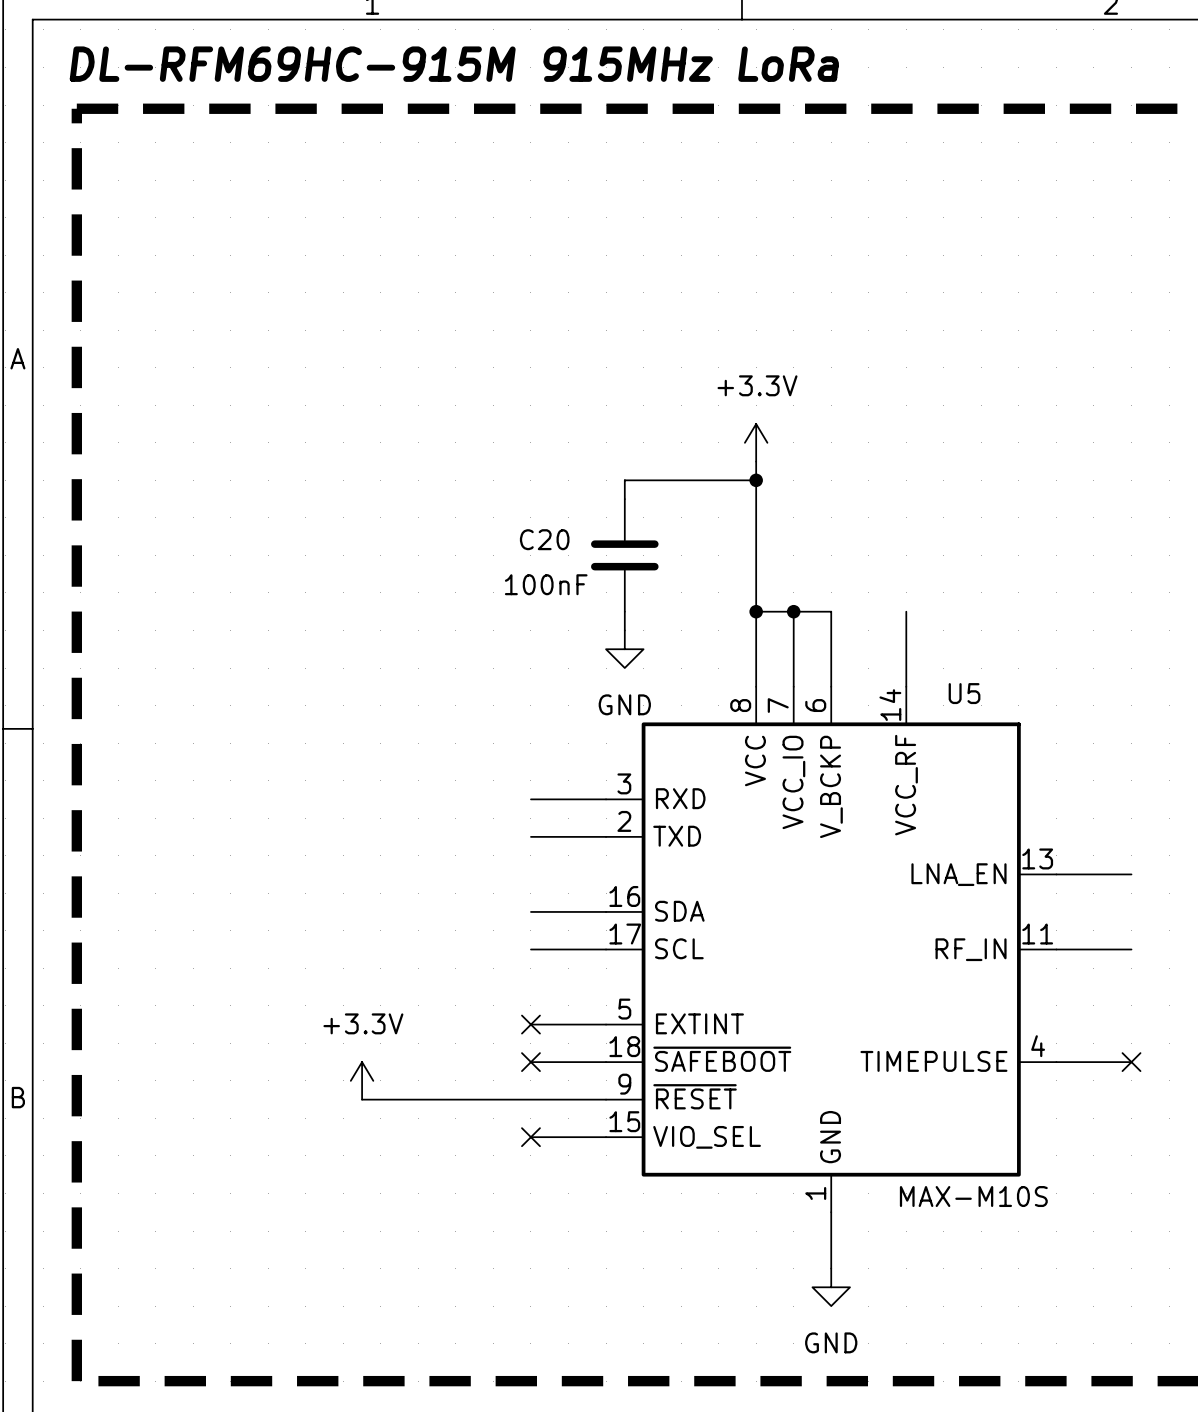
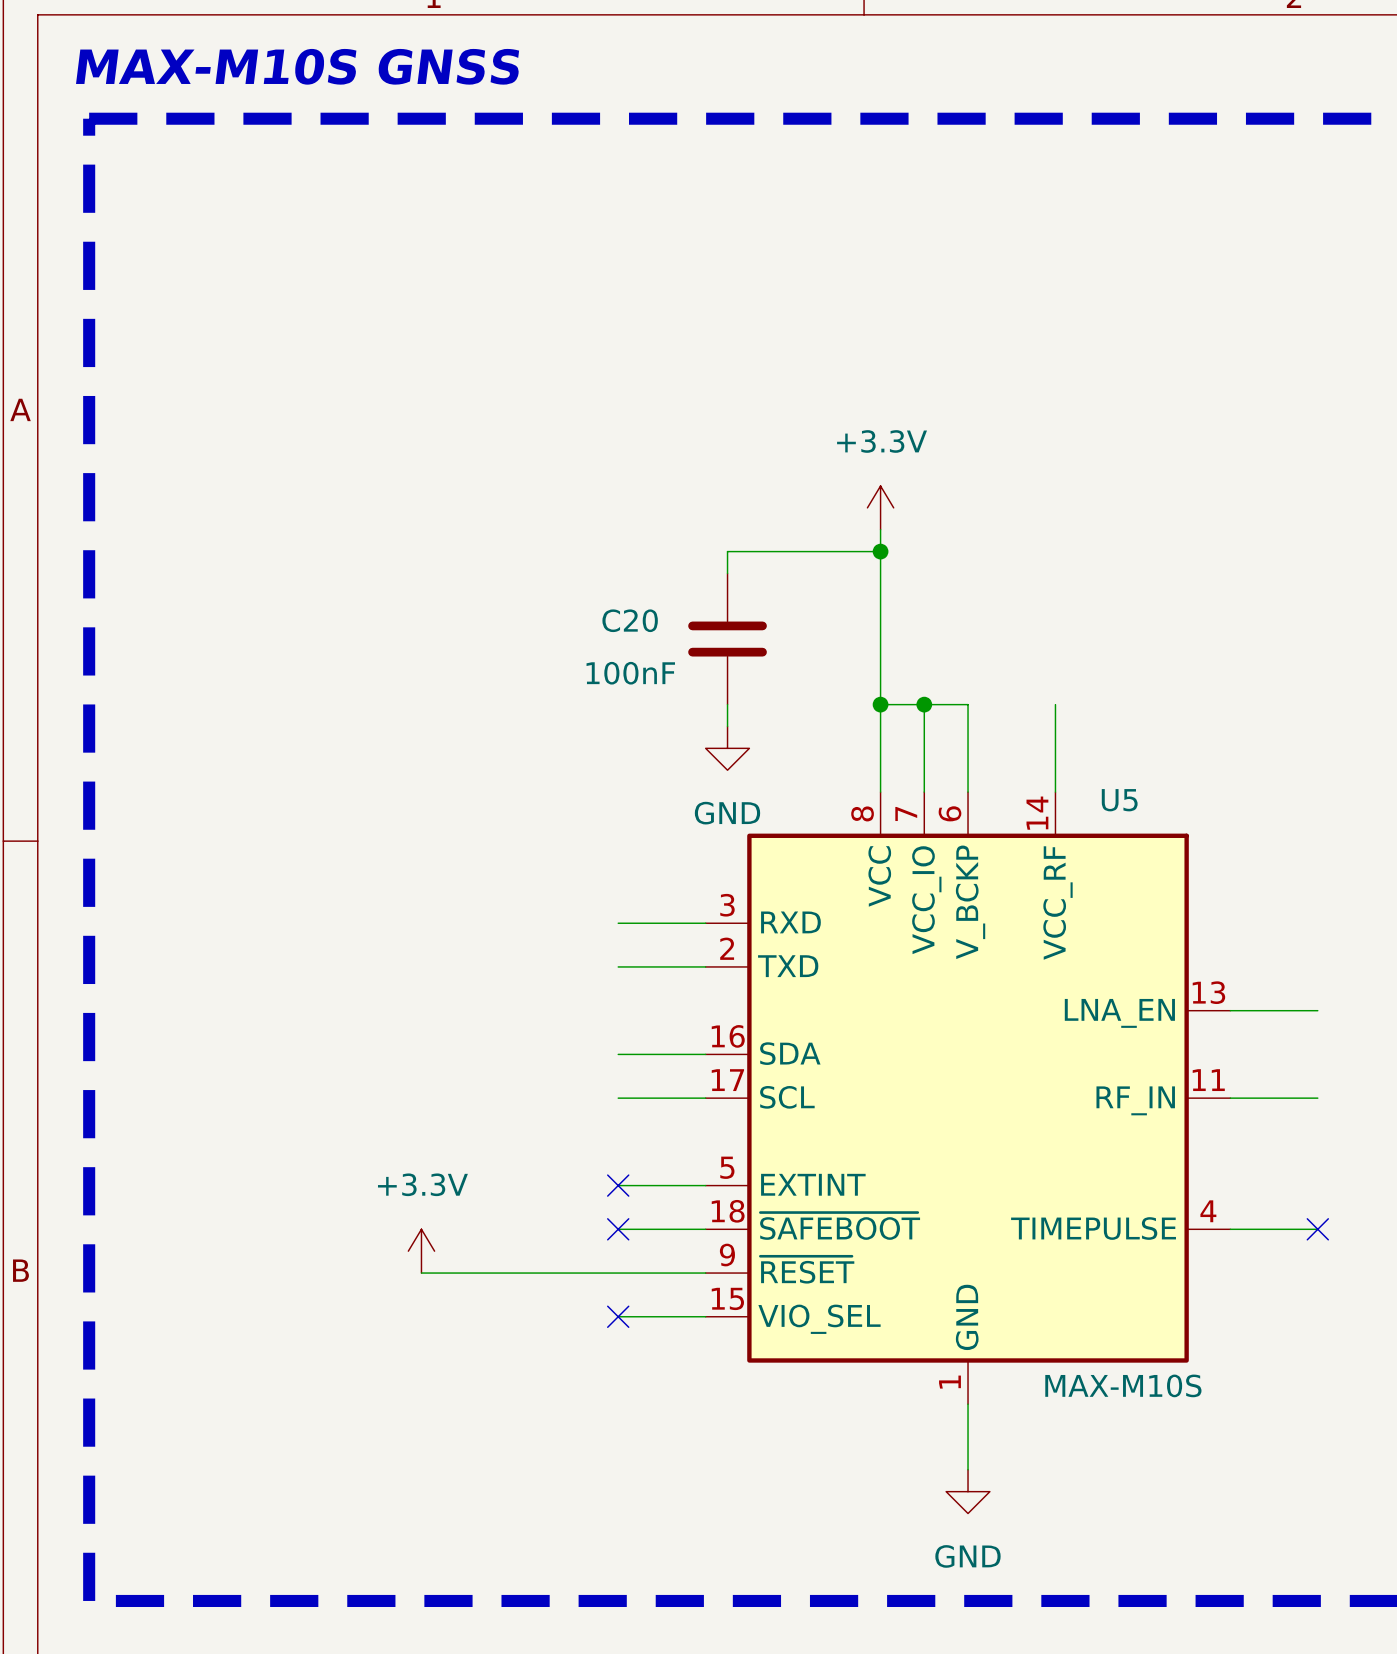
text: DL-RFM69HC-915M 915MHz LoRa (454, 64) -> MAX-M10S GNSS (297, 66)

